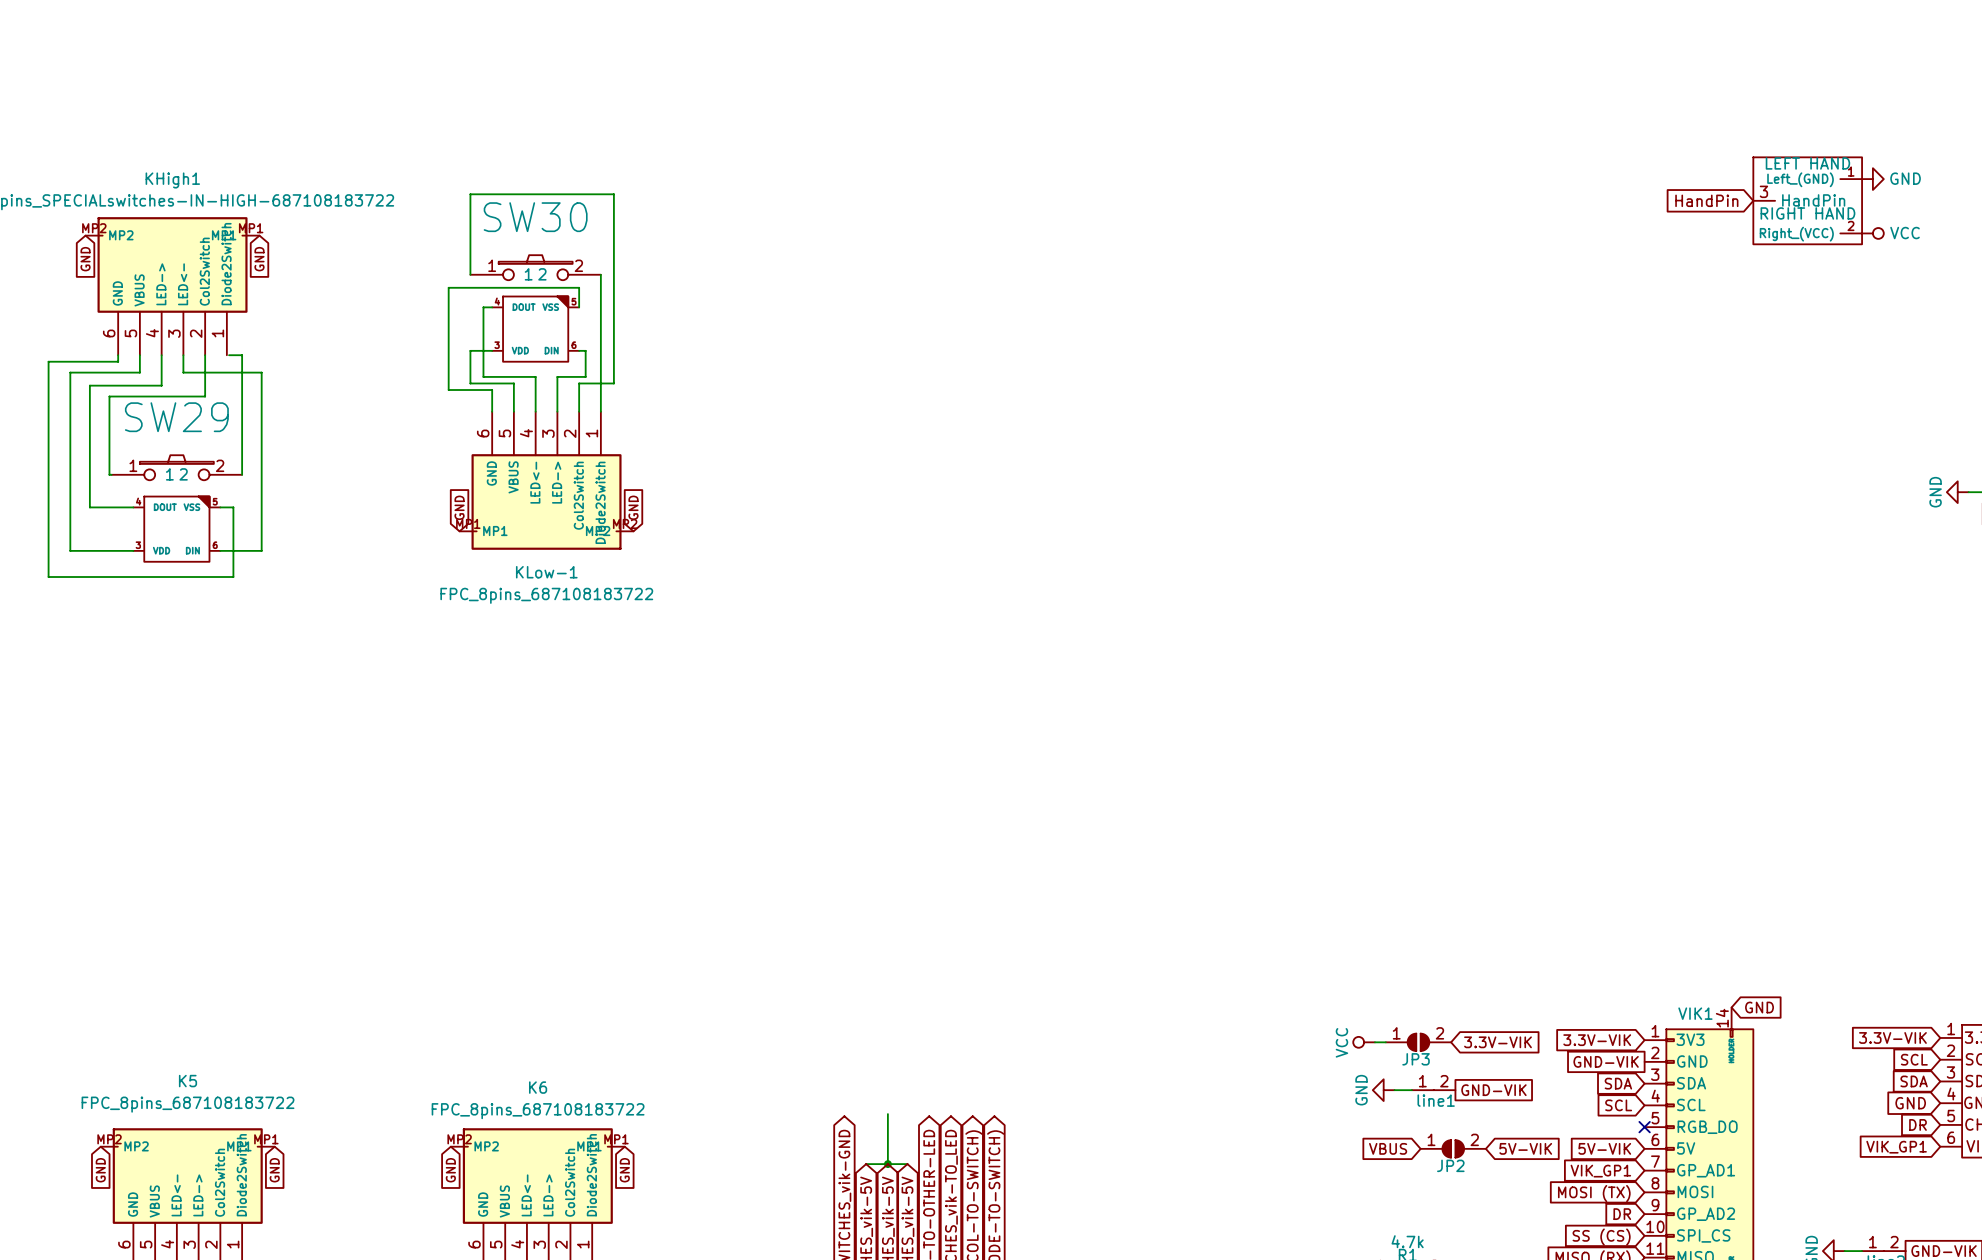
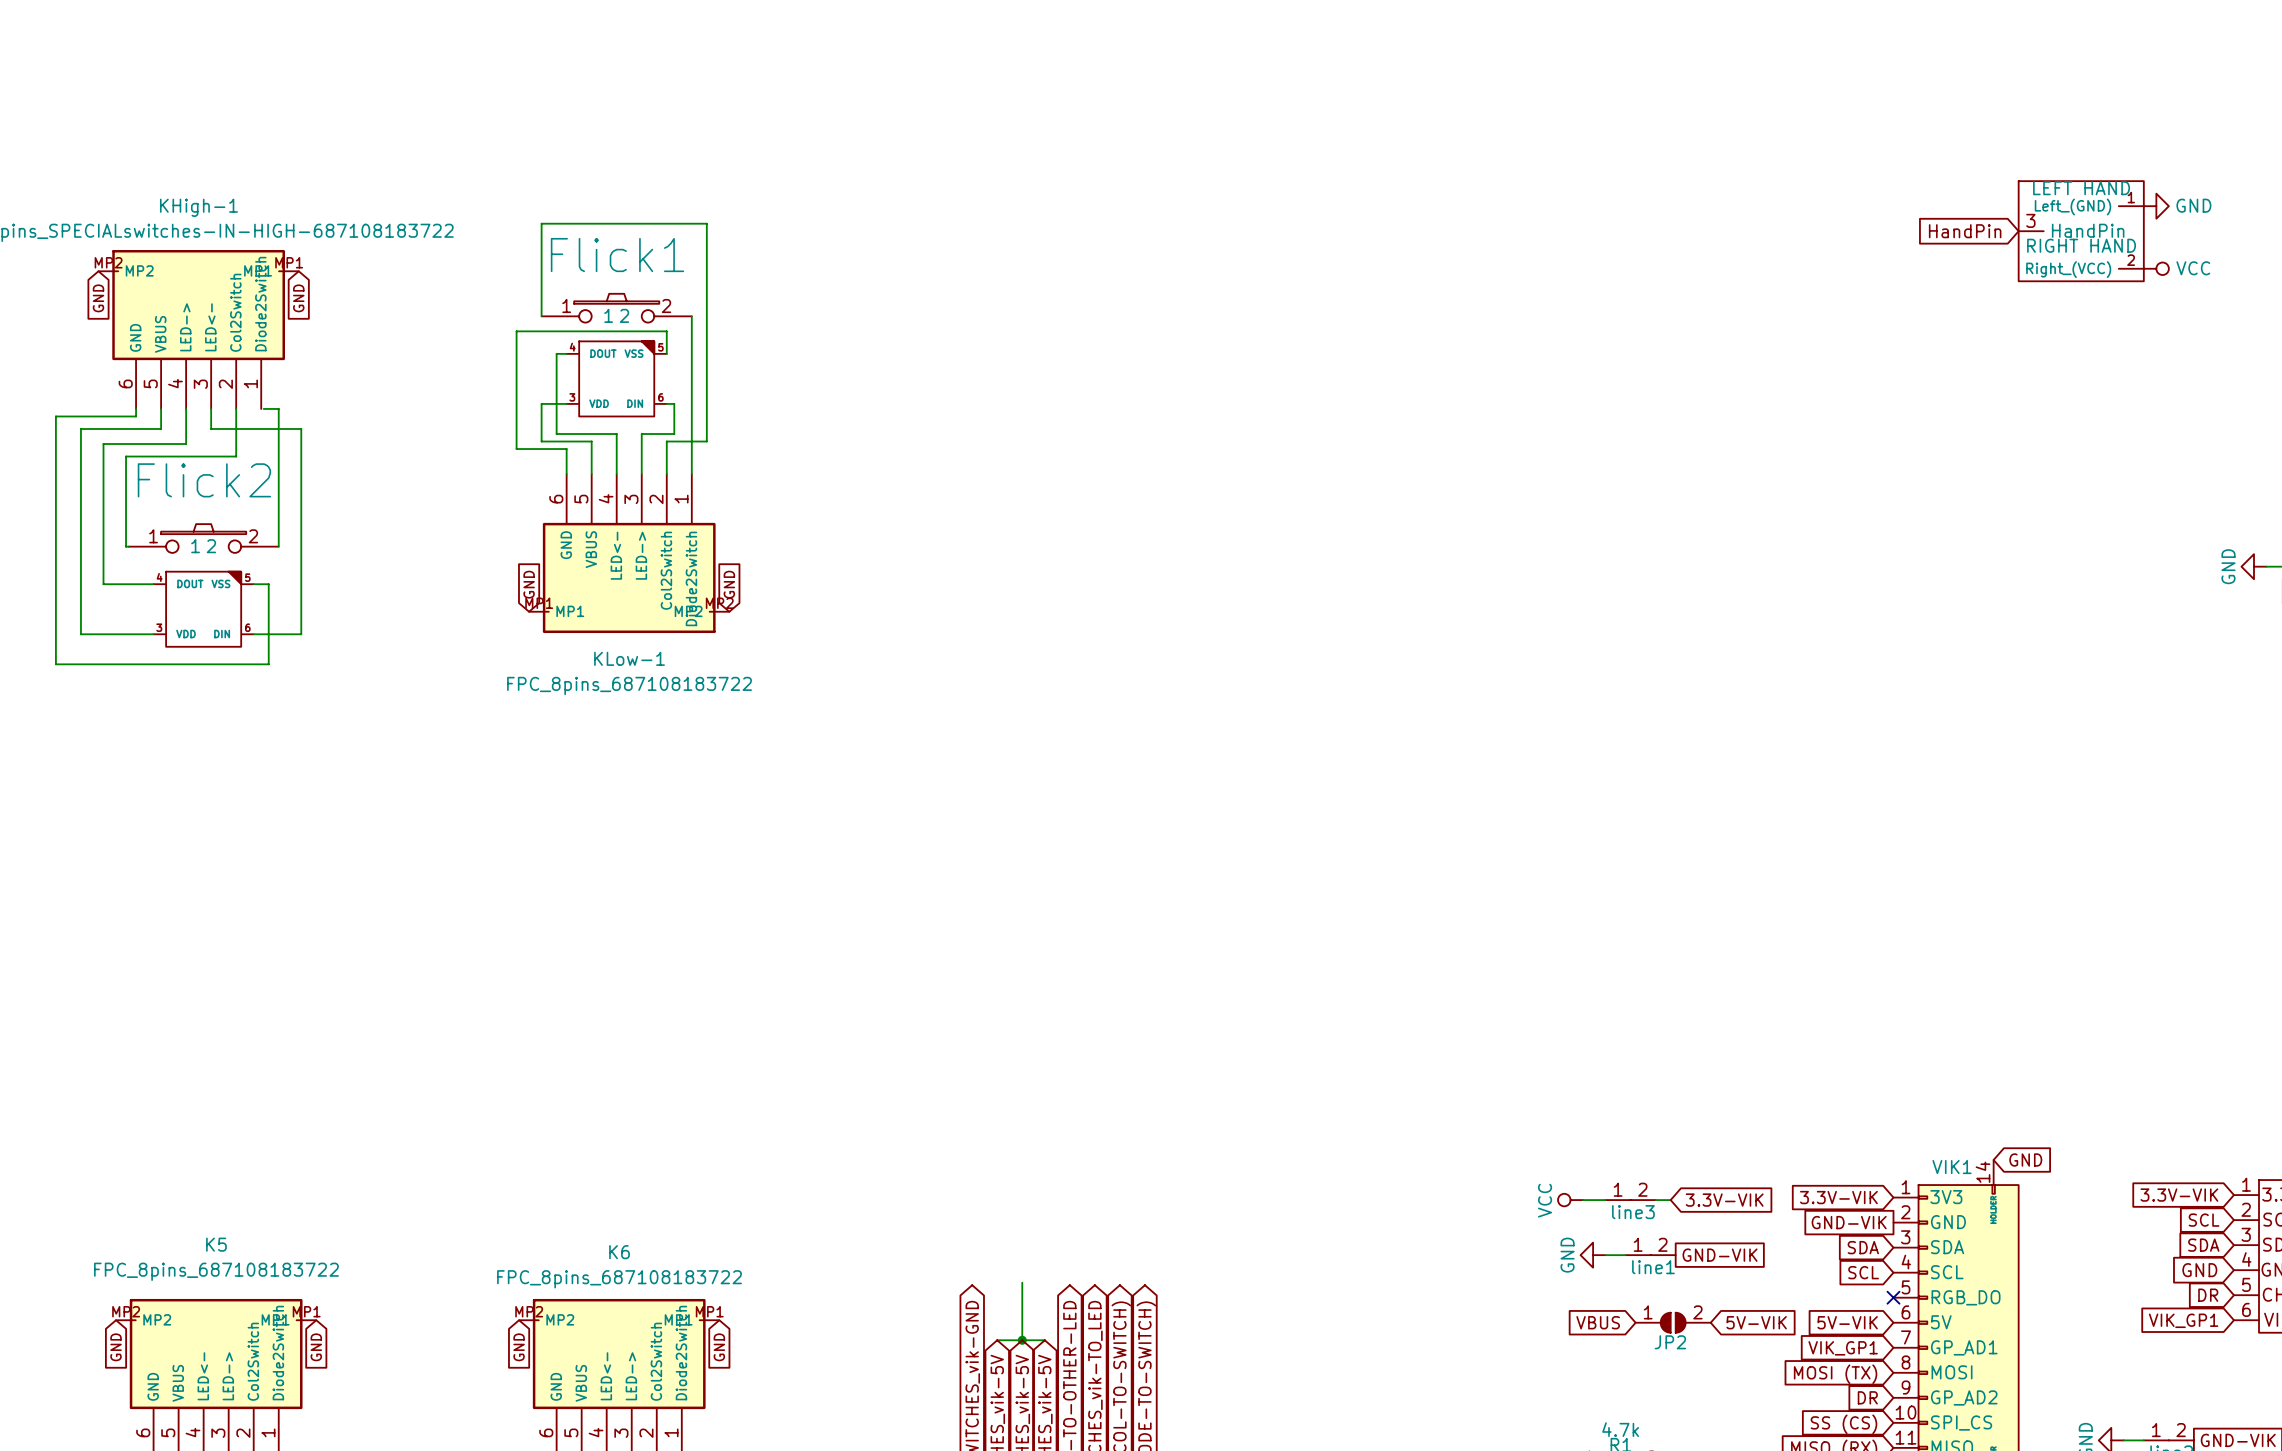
KHigh1 name: KHigh1 (172, 180) -> KHigh-1 (198, 207)
SW30 name: SW30 (535, 217) -> Flick1 (617, 255)
SW29 name: SW29 (176, 417) -> Flick2 (204, 480)
line3: none -> (1630, 1200)
JP3: (1418, 1042) -> none

